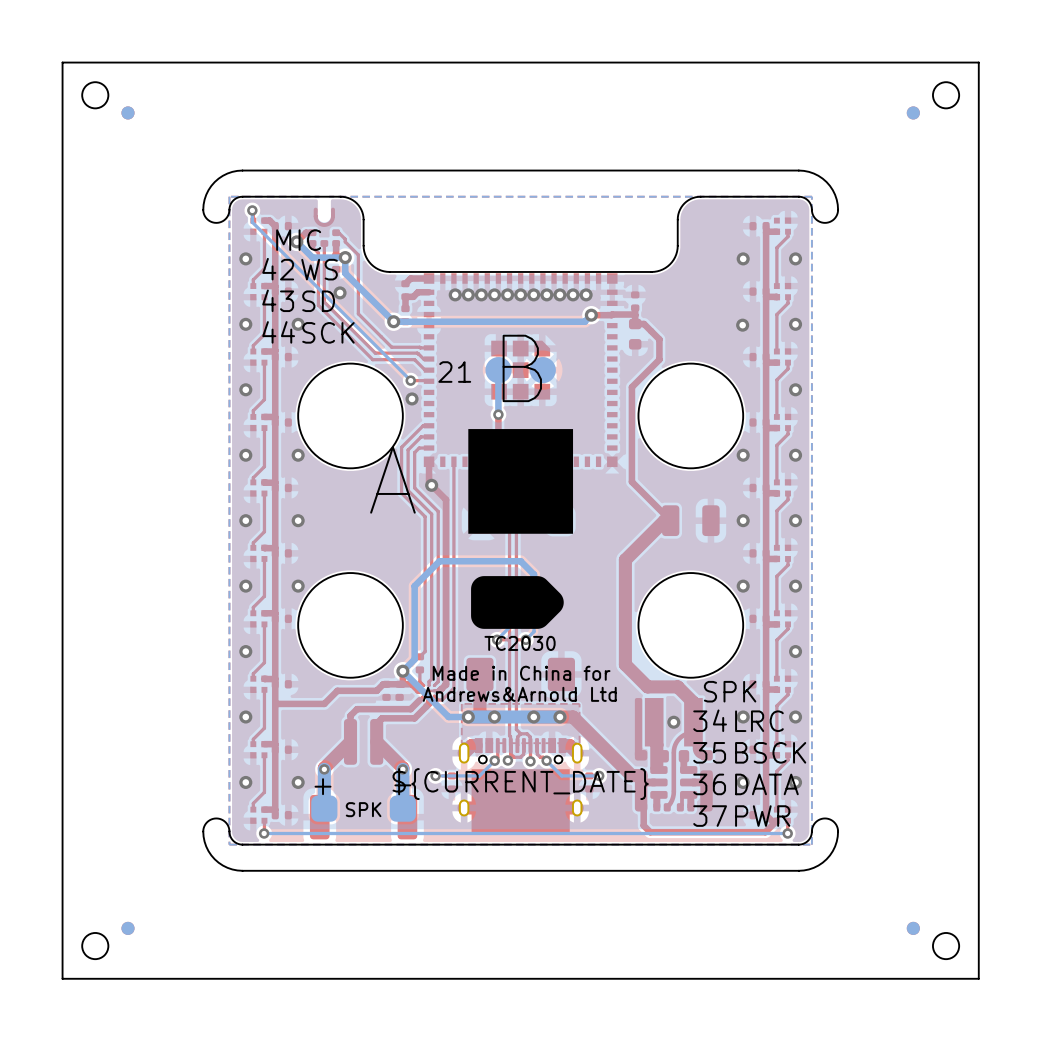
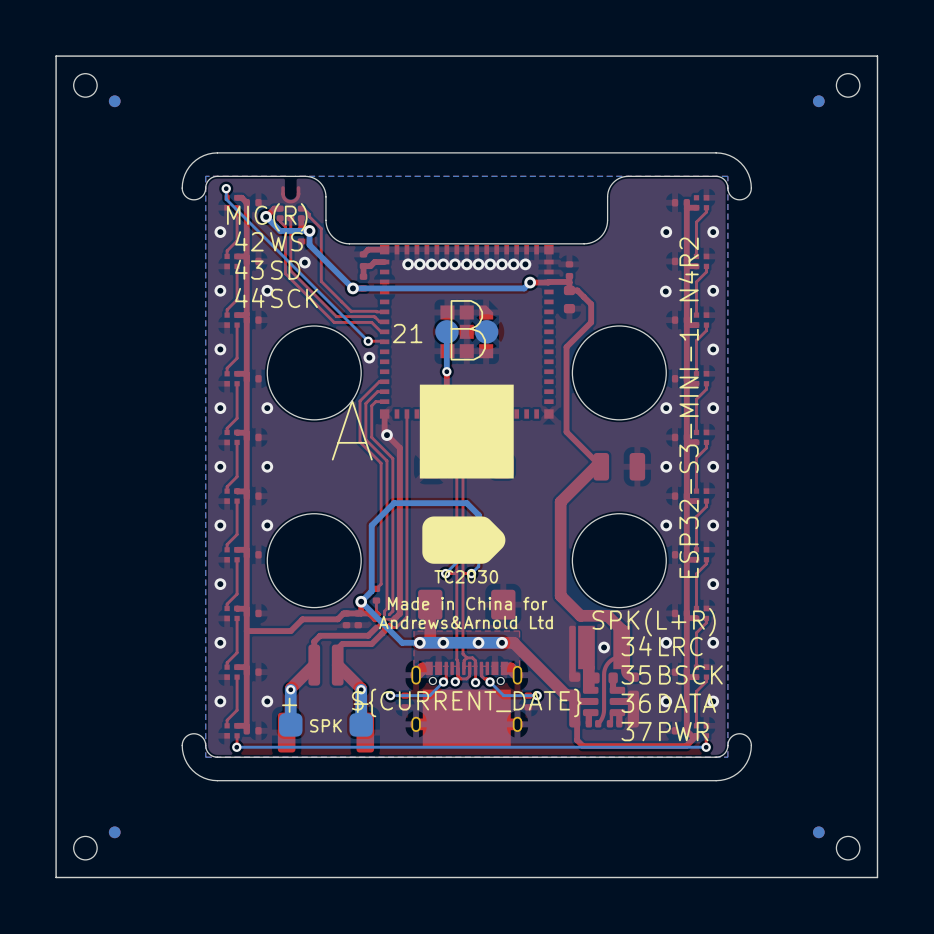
text: MIC (298, 240) -> MIC(R) (267, 217)
text: none -> ESP32-S3-MINI-1-N4R2 (688, 407)
text: SPK (730, 691) -> SPK(L+R) (654, 622)

